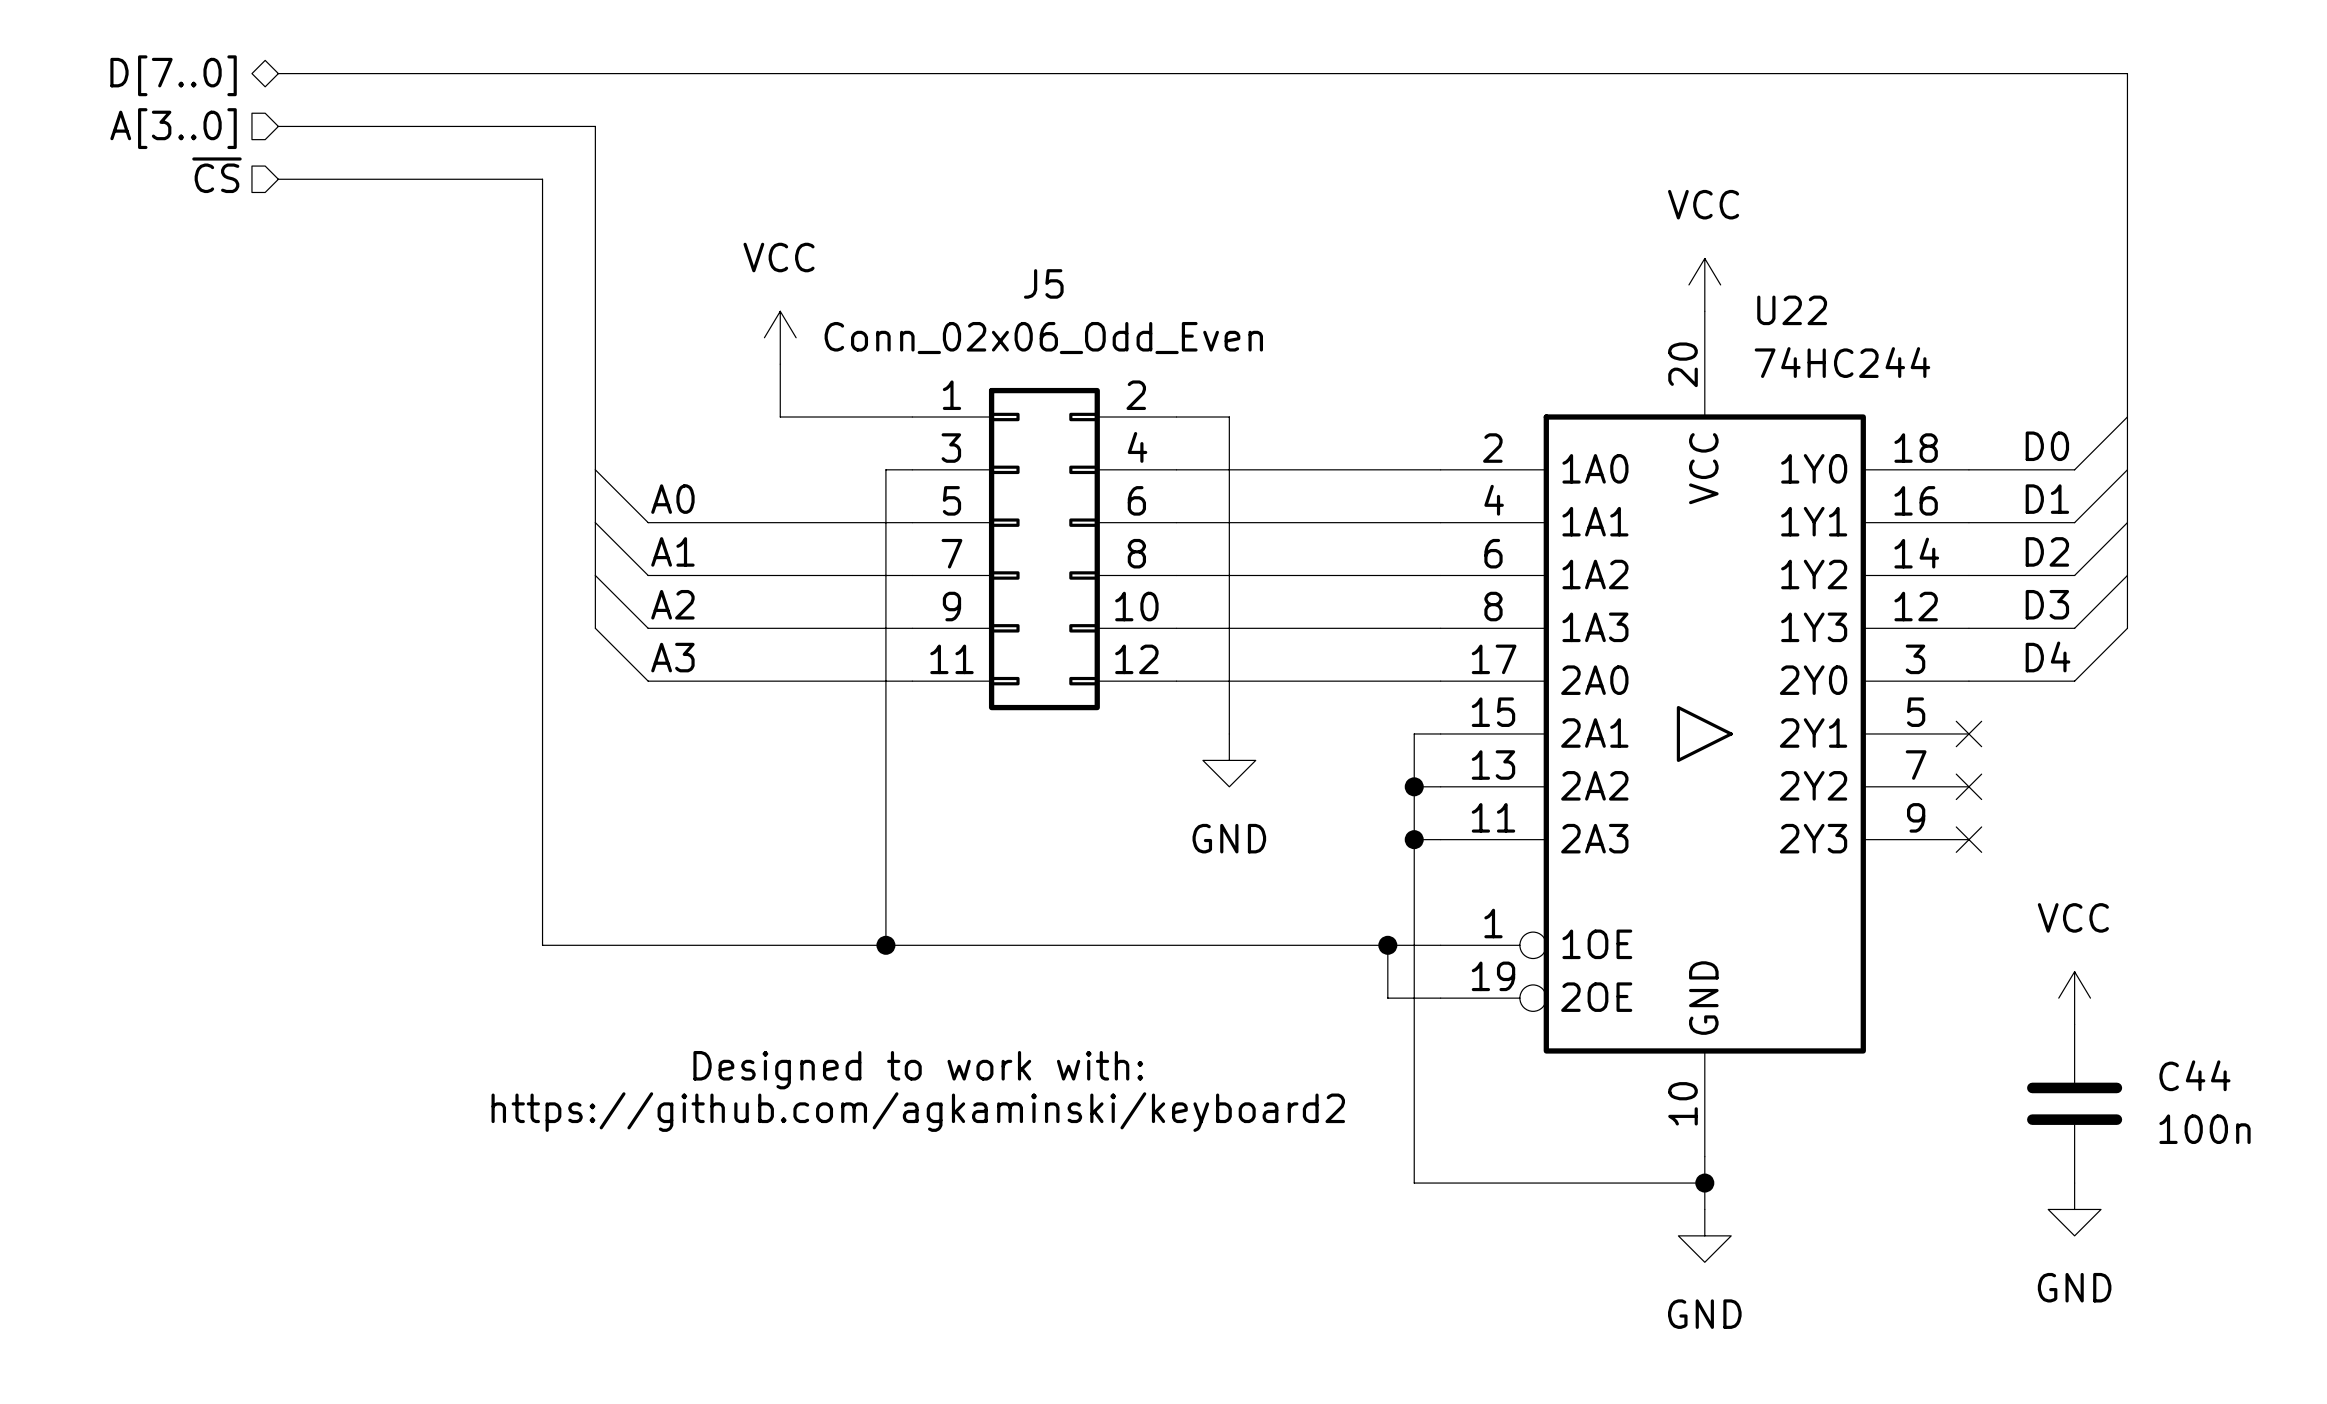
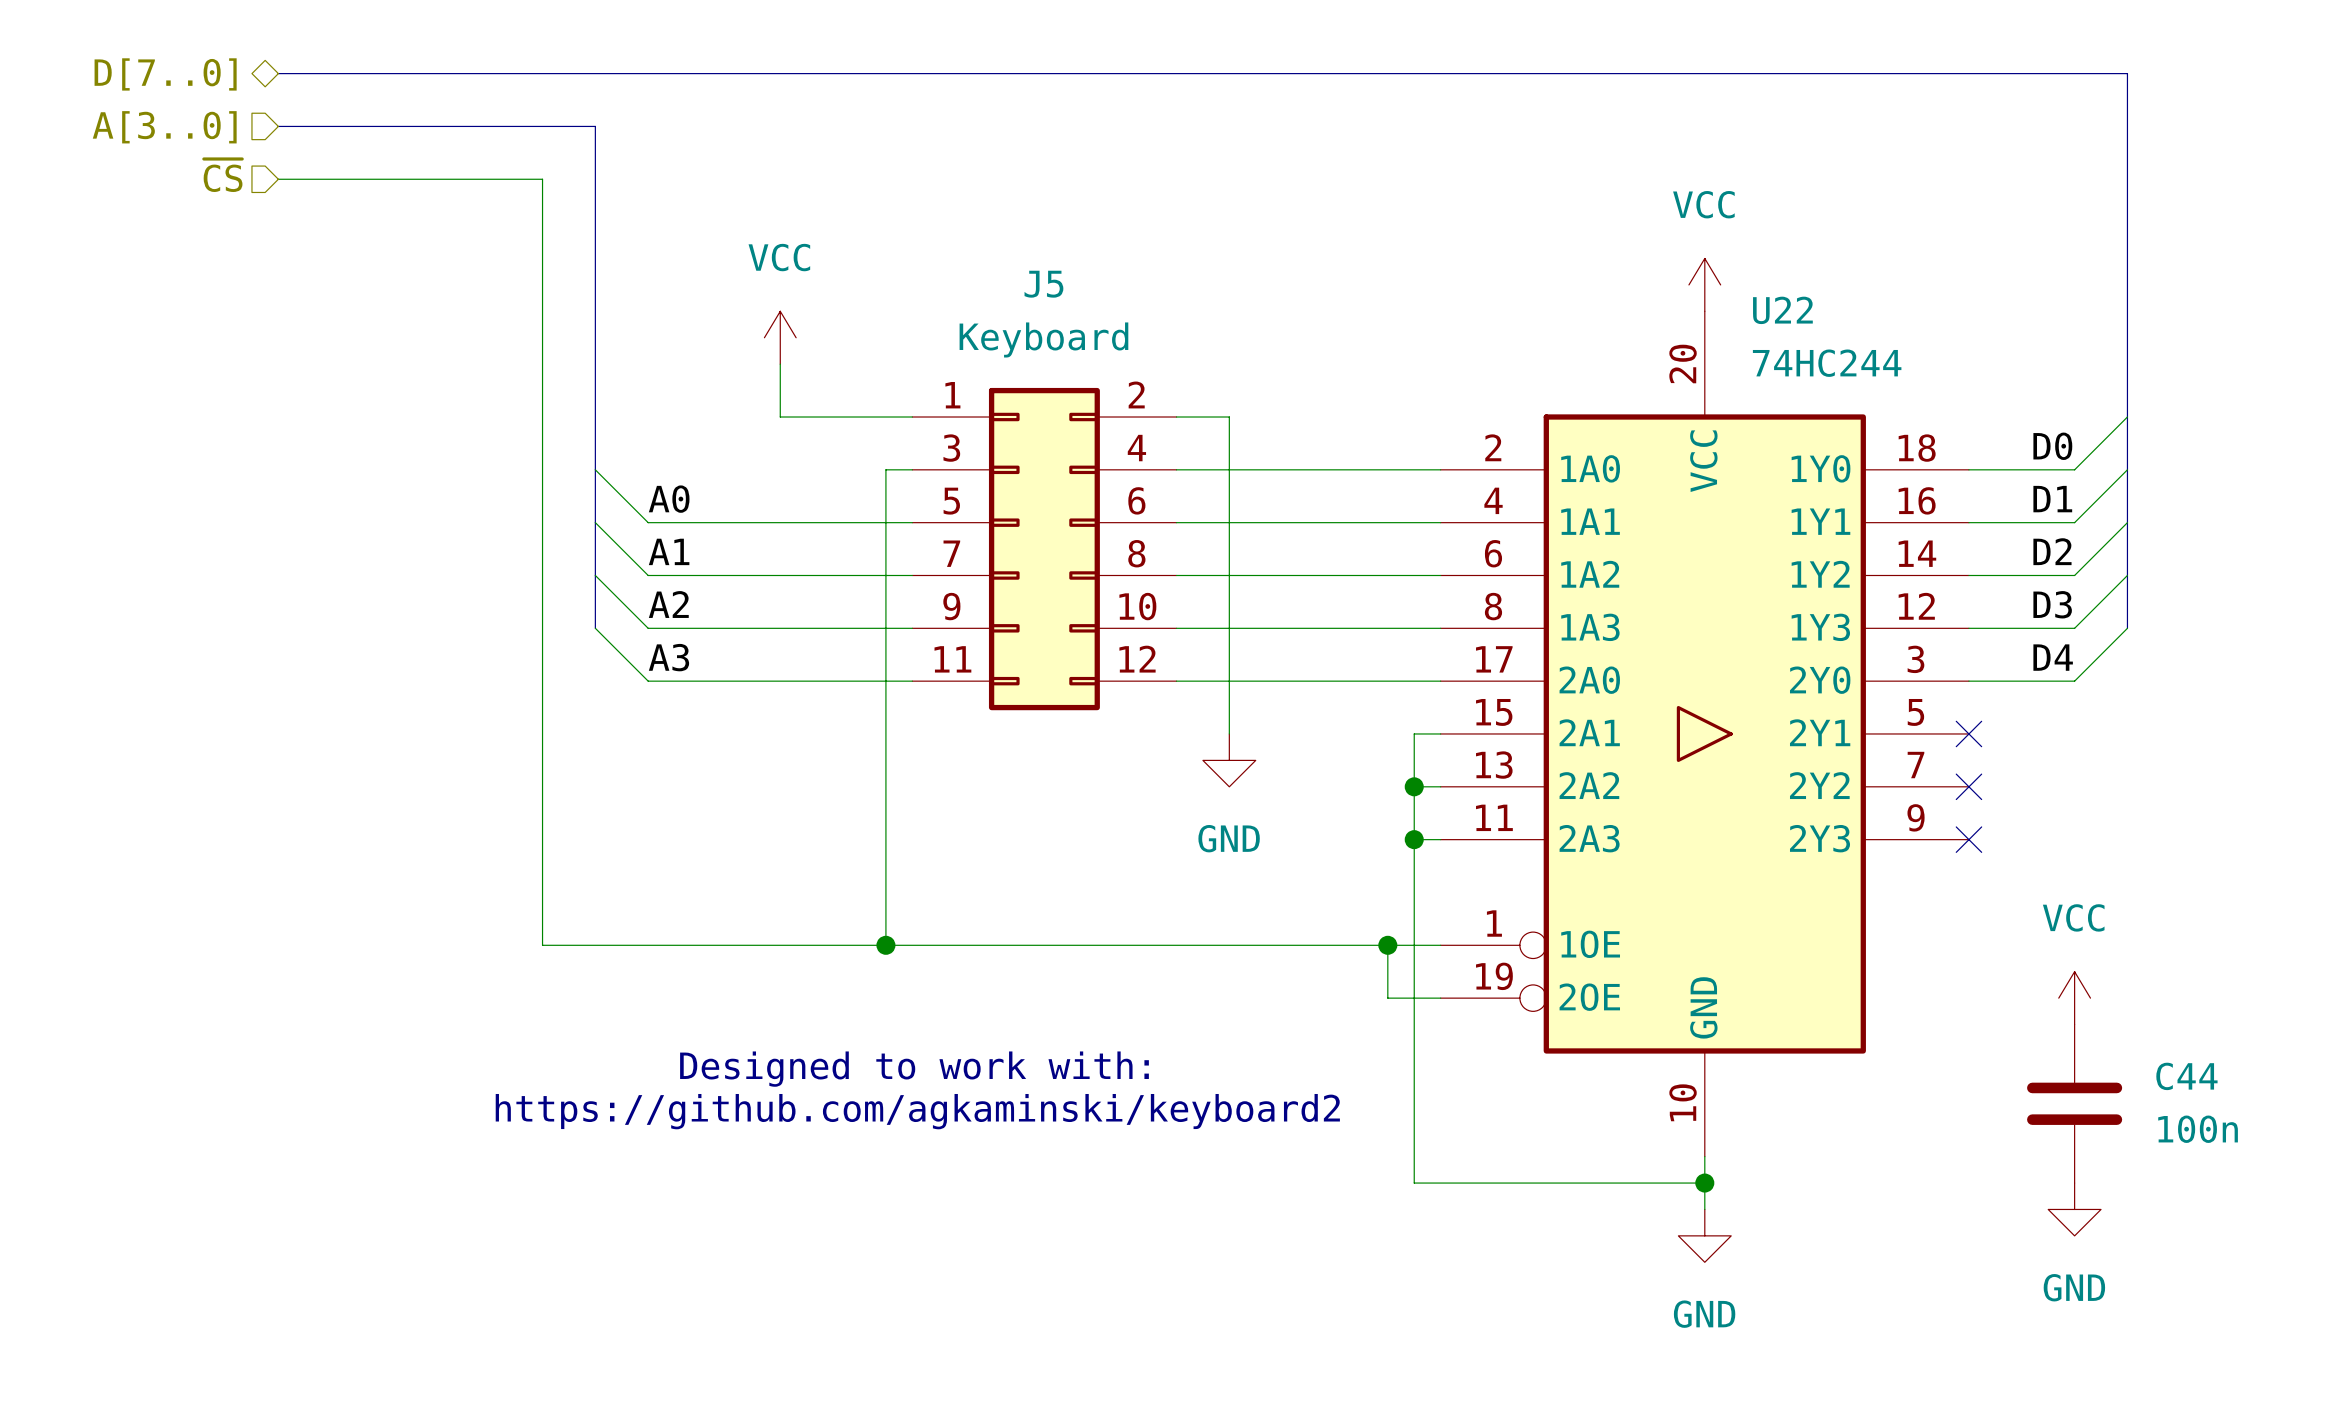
J5 value: Conn_02x06_Odd_Even (1043, 338) -> Keyboard (1043, 339)

